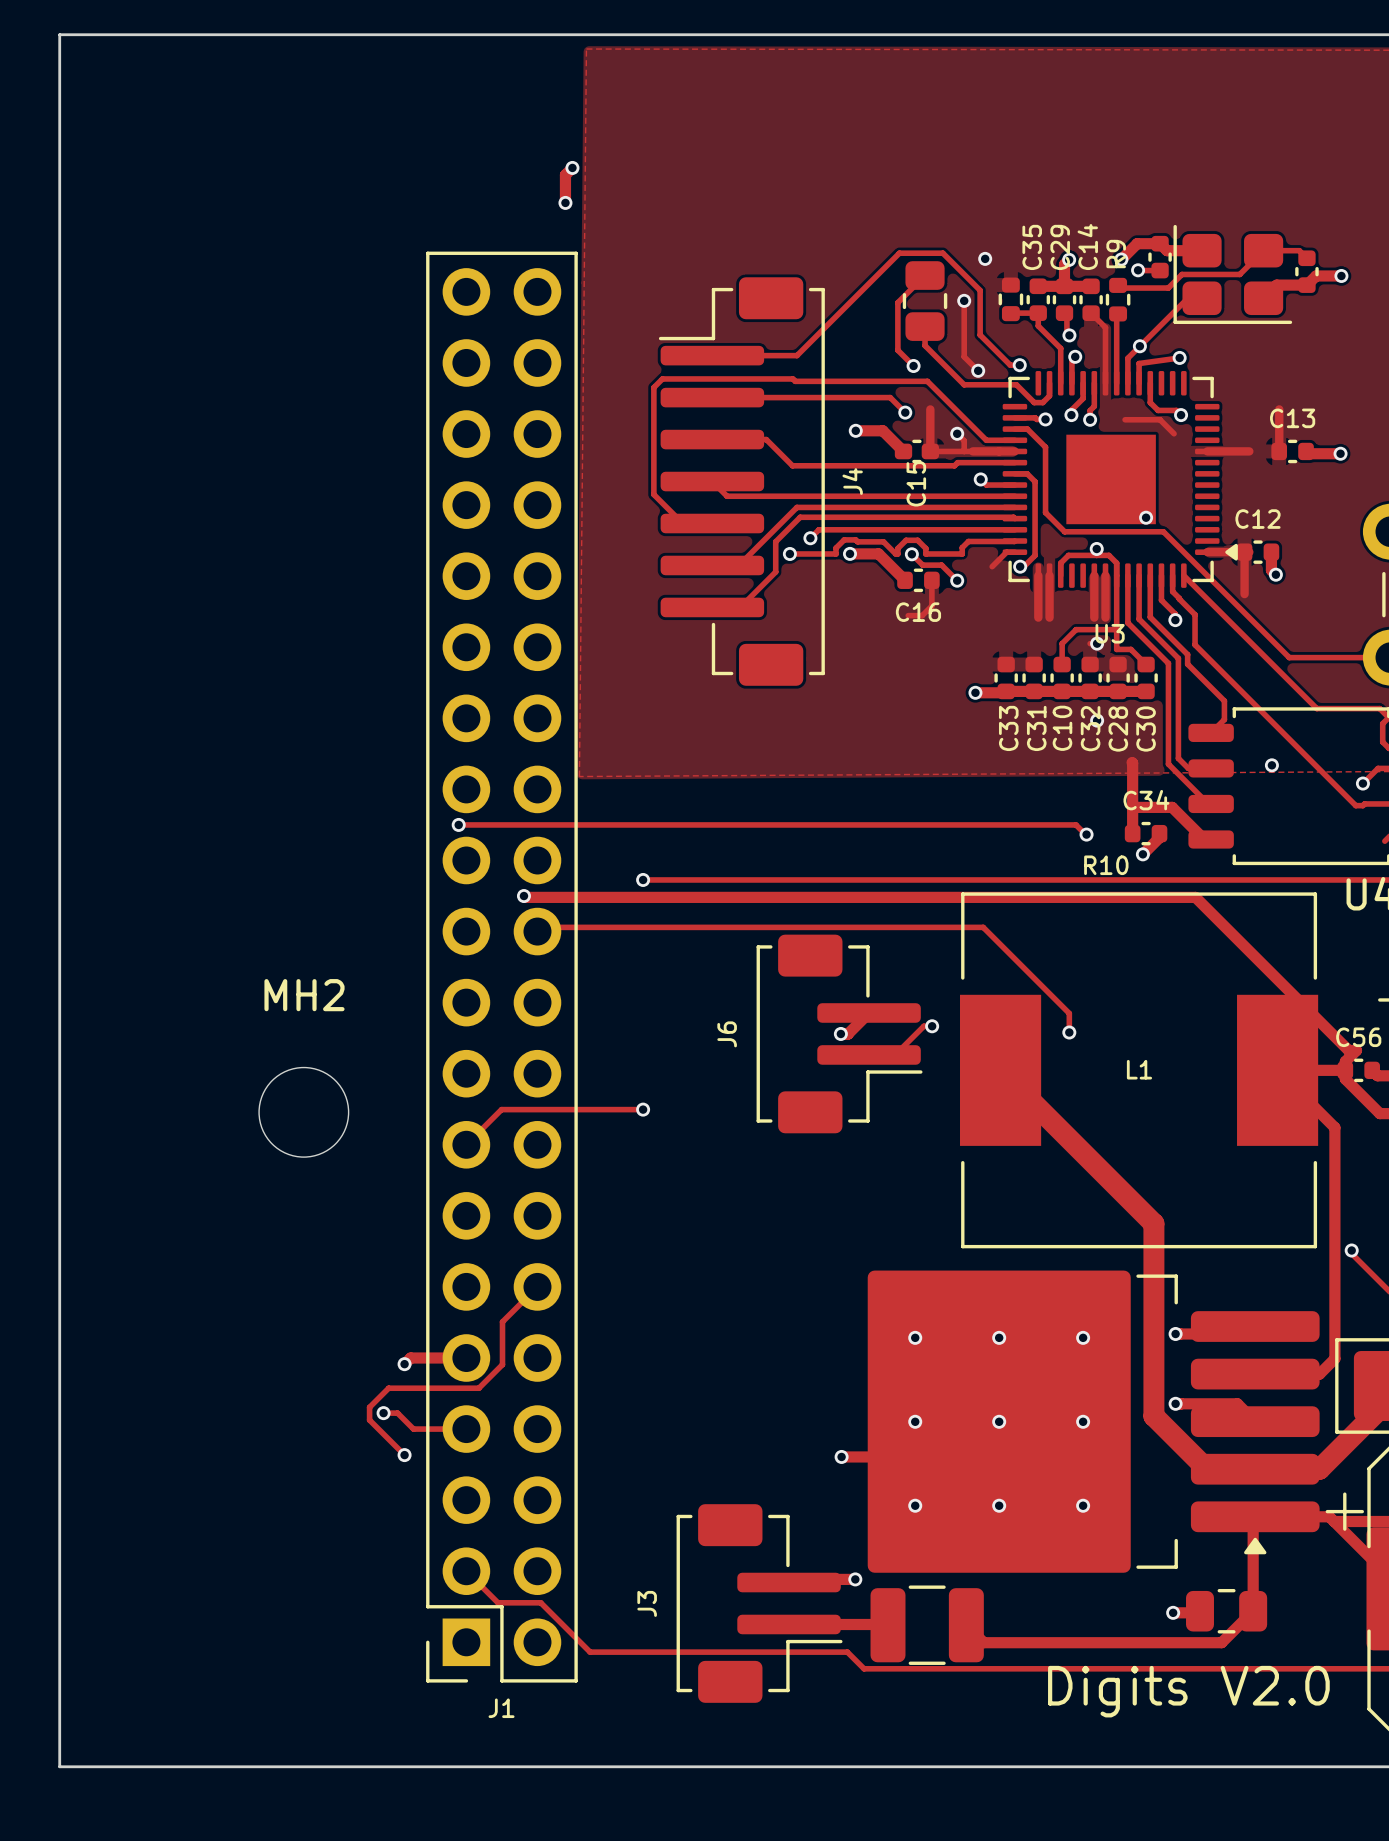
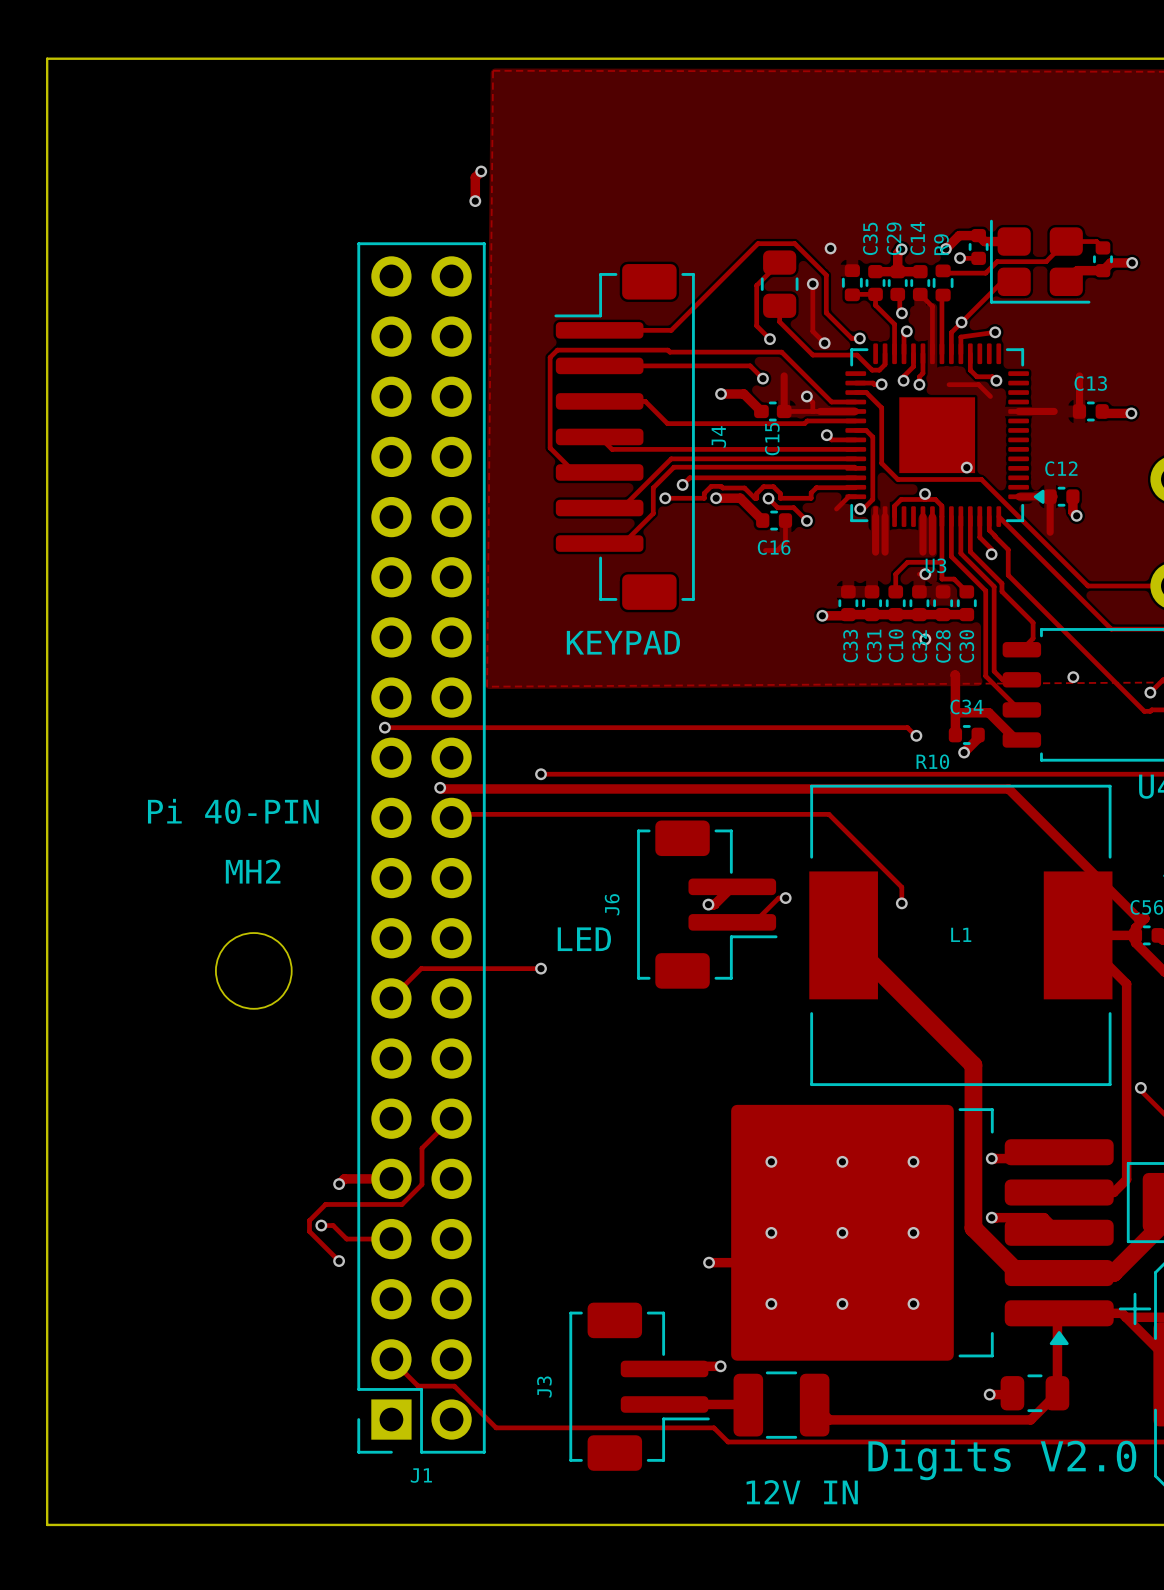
text: none -> KEYPAD (623, 642)
text: none -> Pi 40-PIN (233, 811)
text: none -> LED (584, 939)
text: none -> 12V IN (802, 1492)

